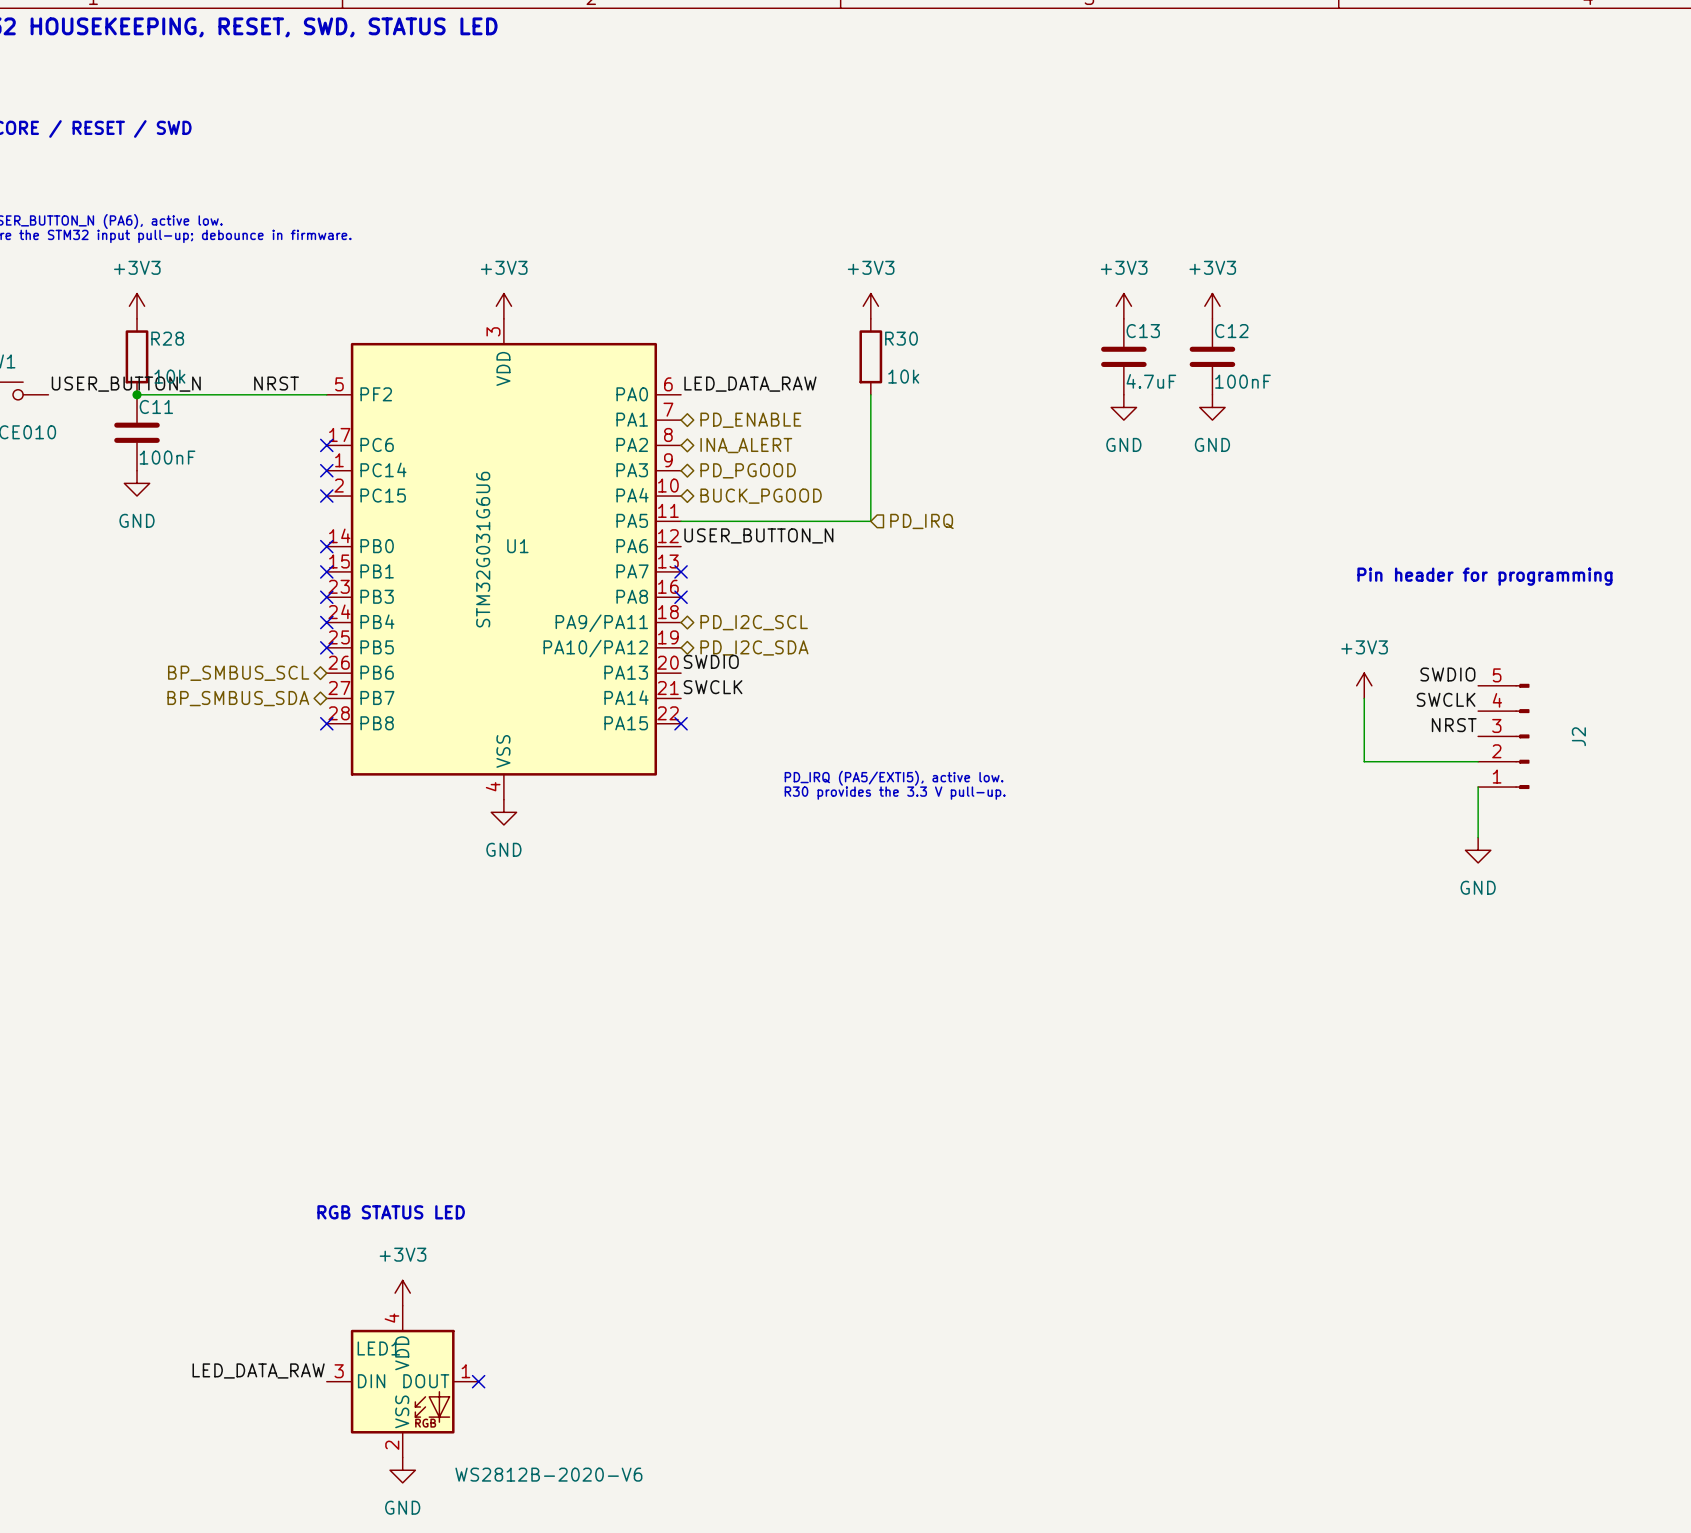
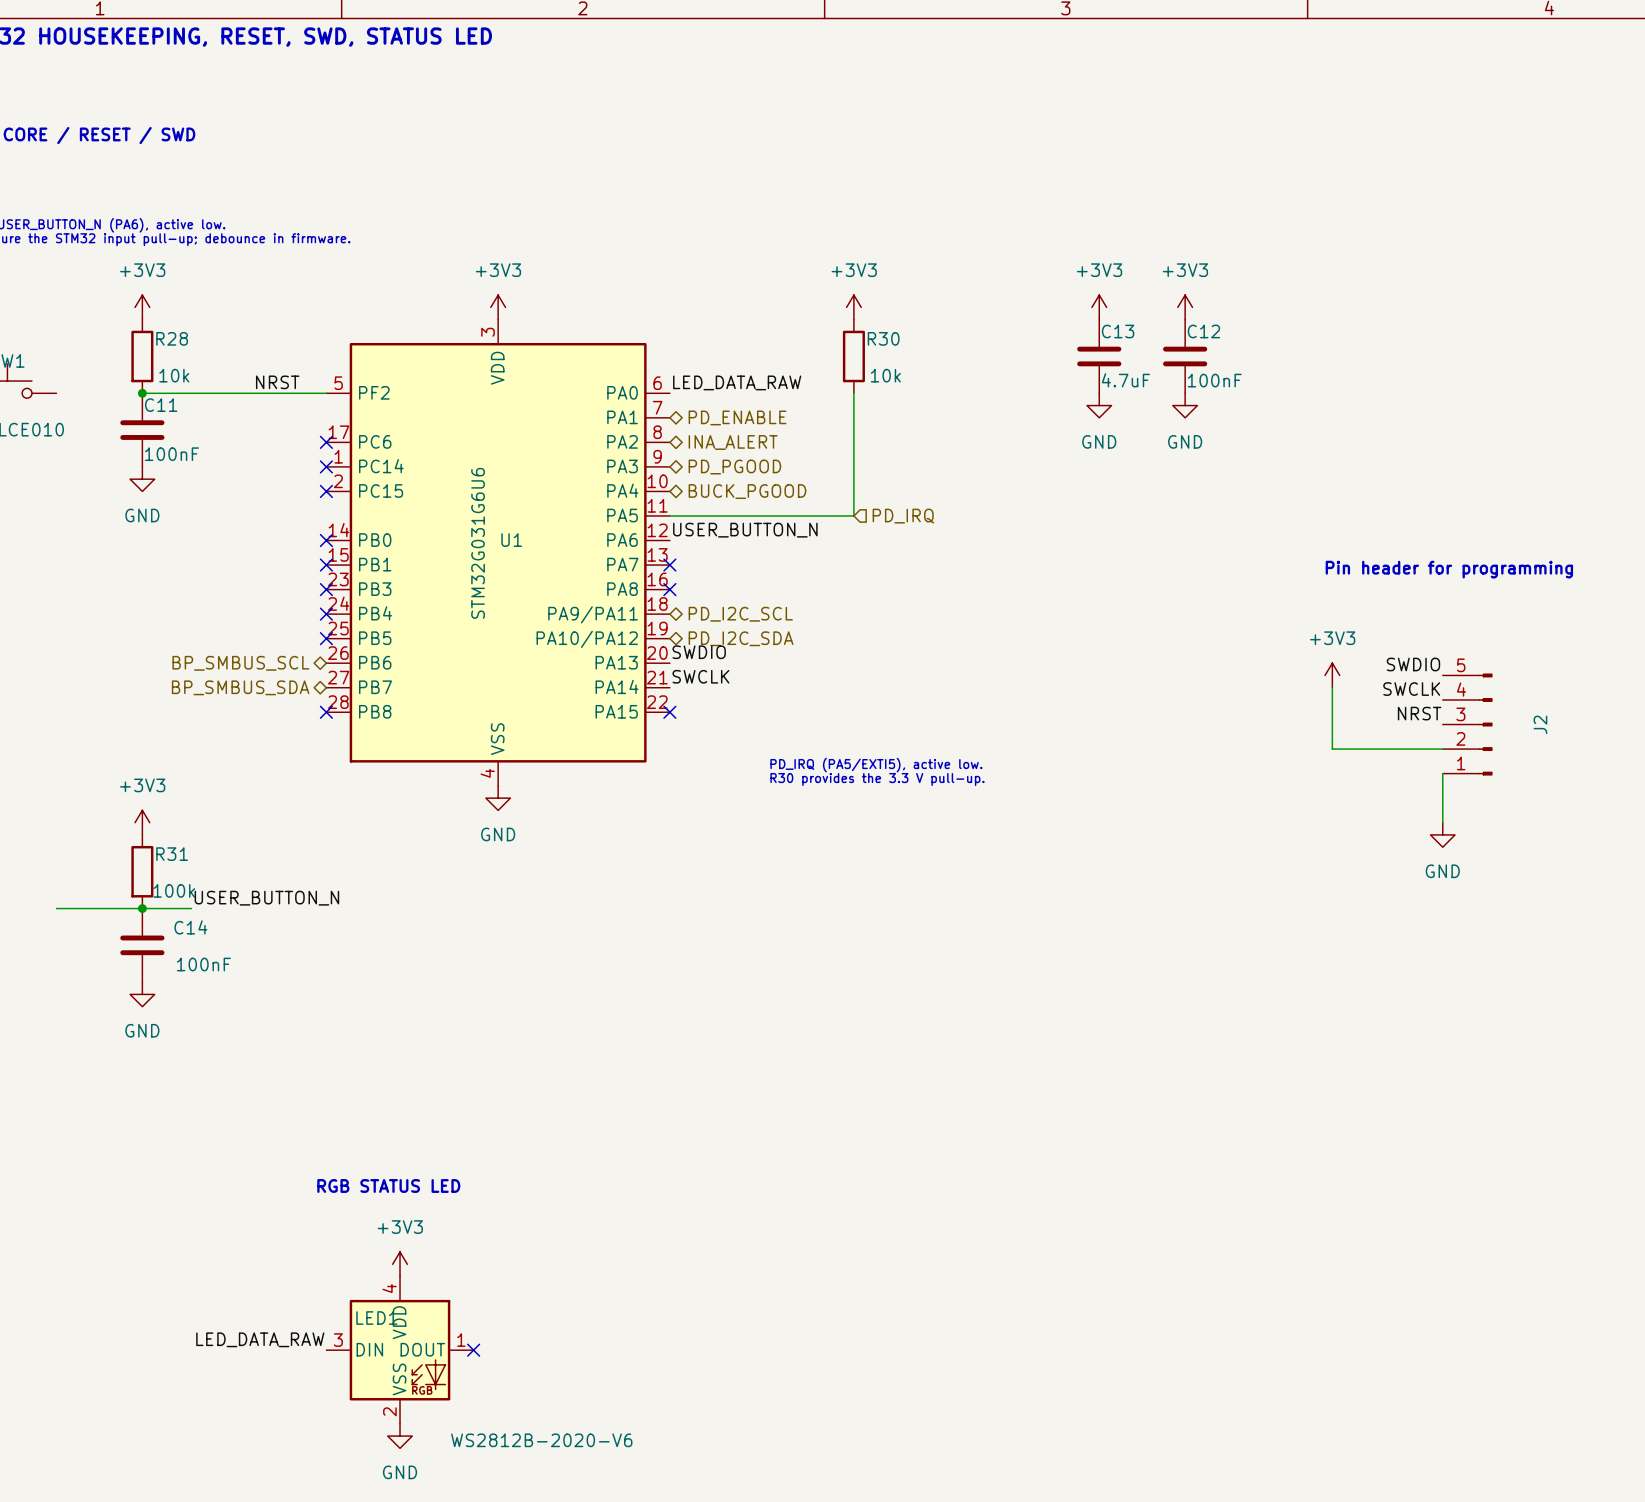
label: USER_BUTTON_N (126, 384) -> none
power symbol: none -> +3V3 (142, 822)
R31: none -> 100k (142, 871)
label: none -> USER_BUTTON_N (266, 898)
wire: none -> (56, 908) (191, 908)
junction: none -> (142, 908)
C14: none -> 100nF (142, 945)
power symbol: none -> GND (142, 994)

